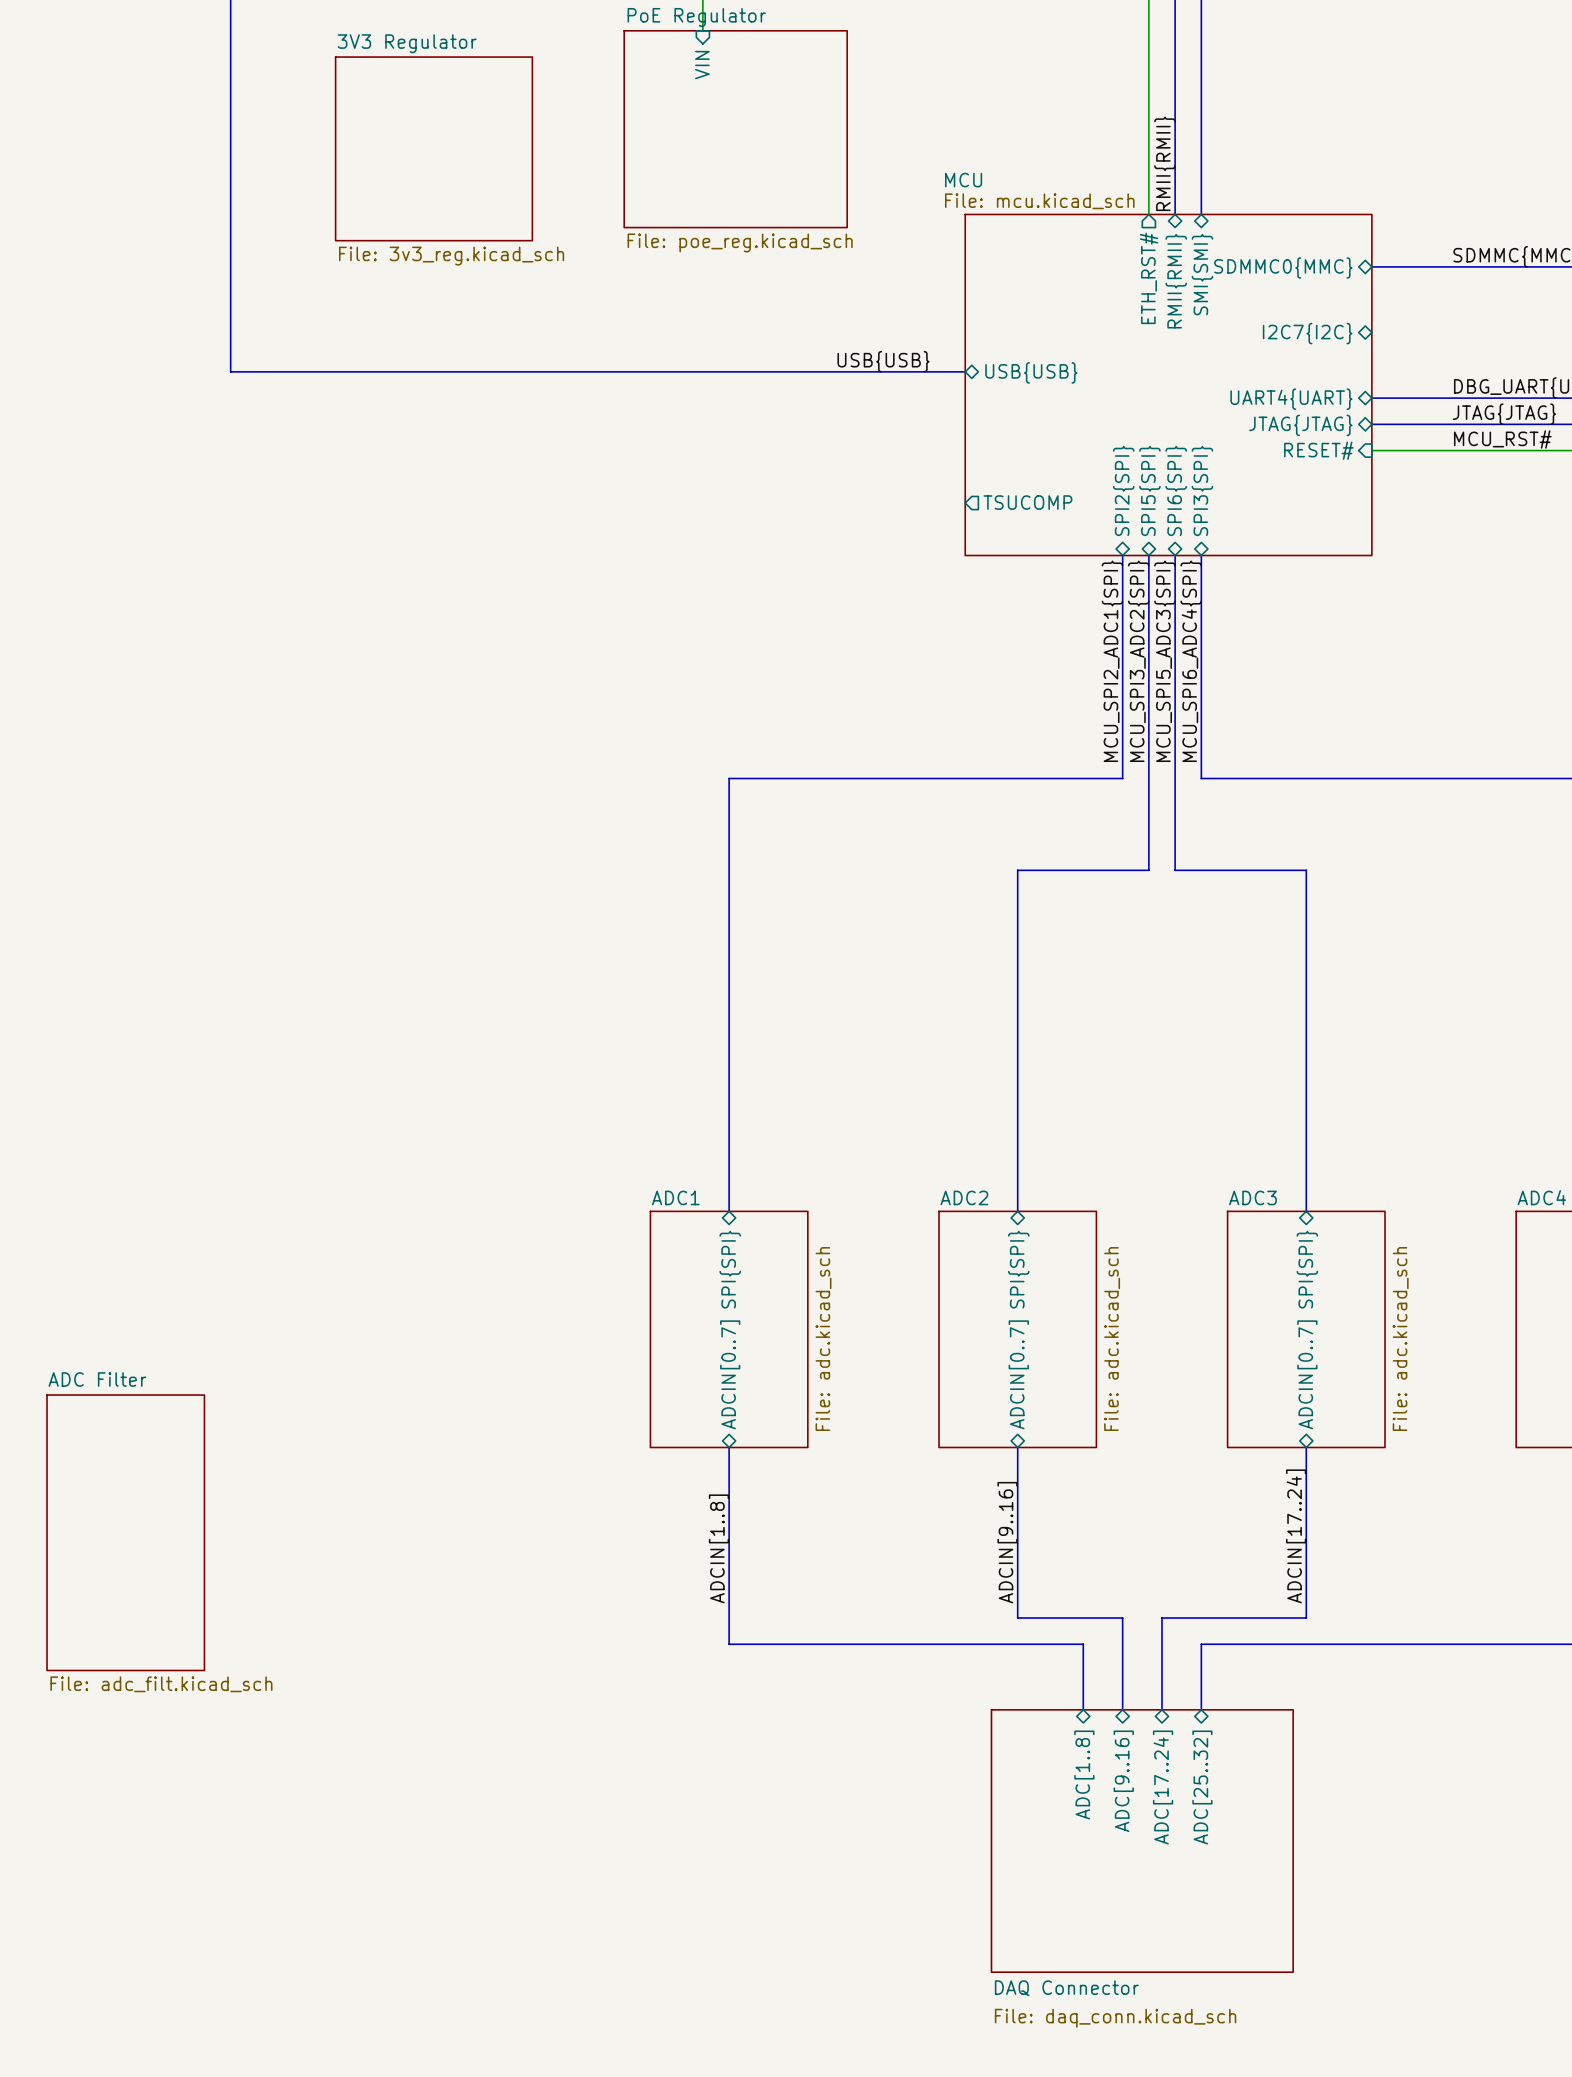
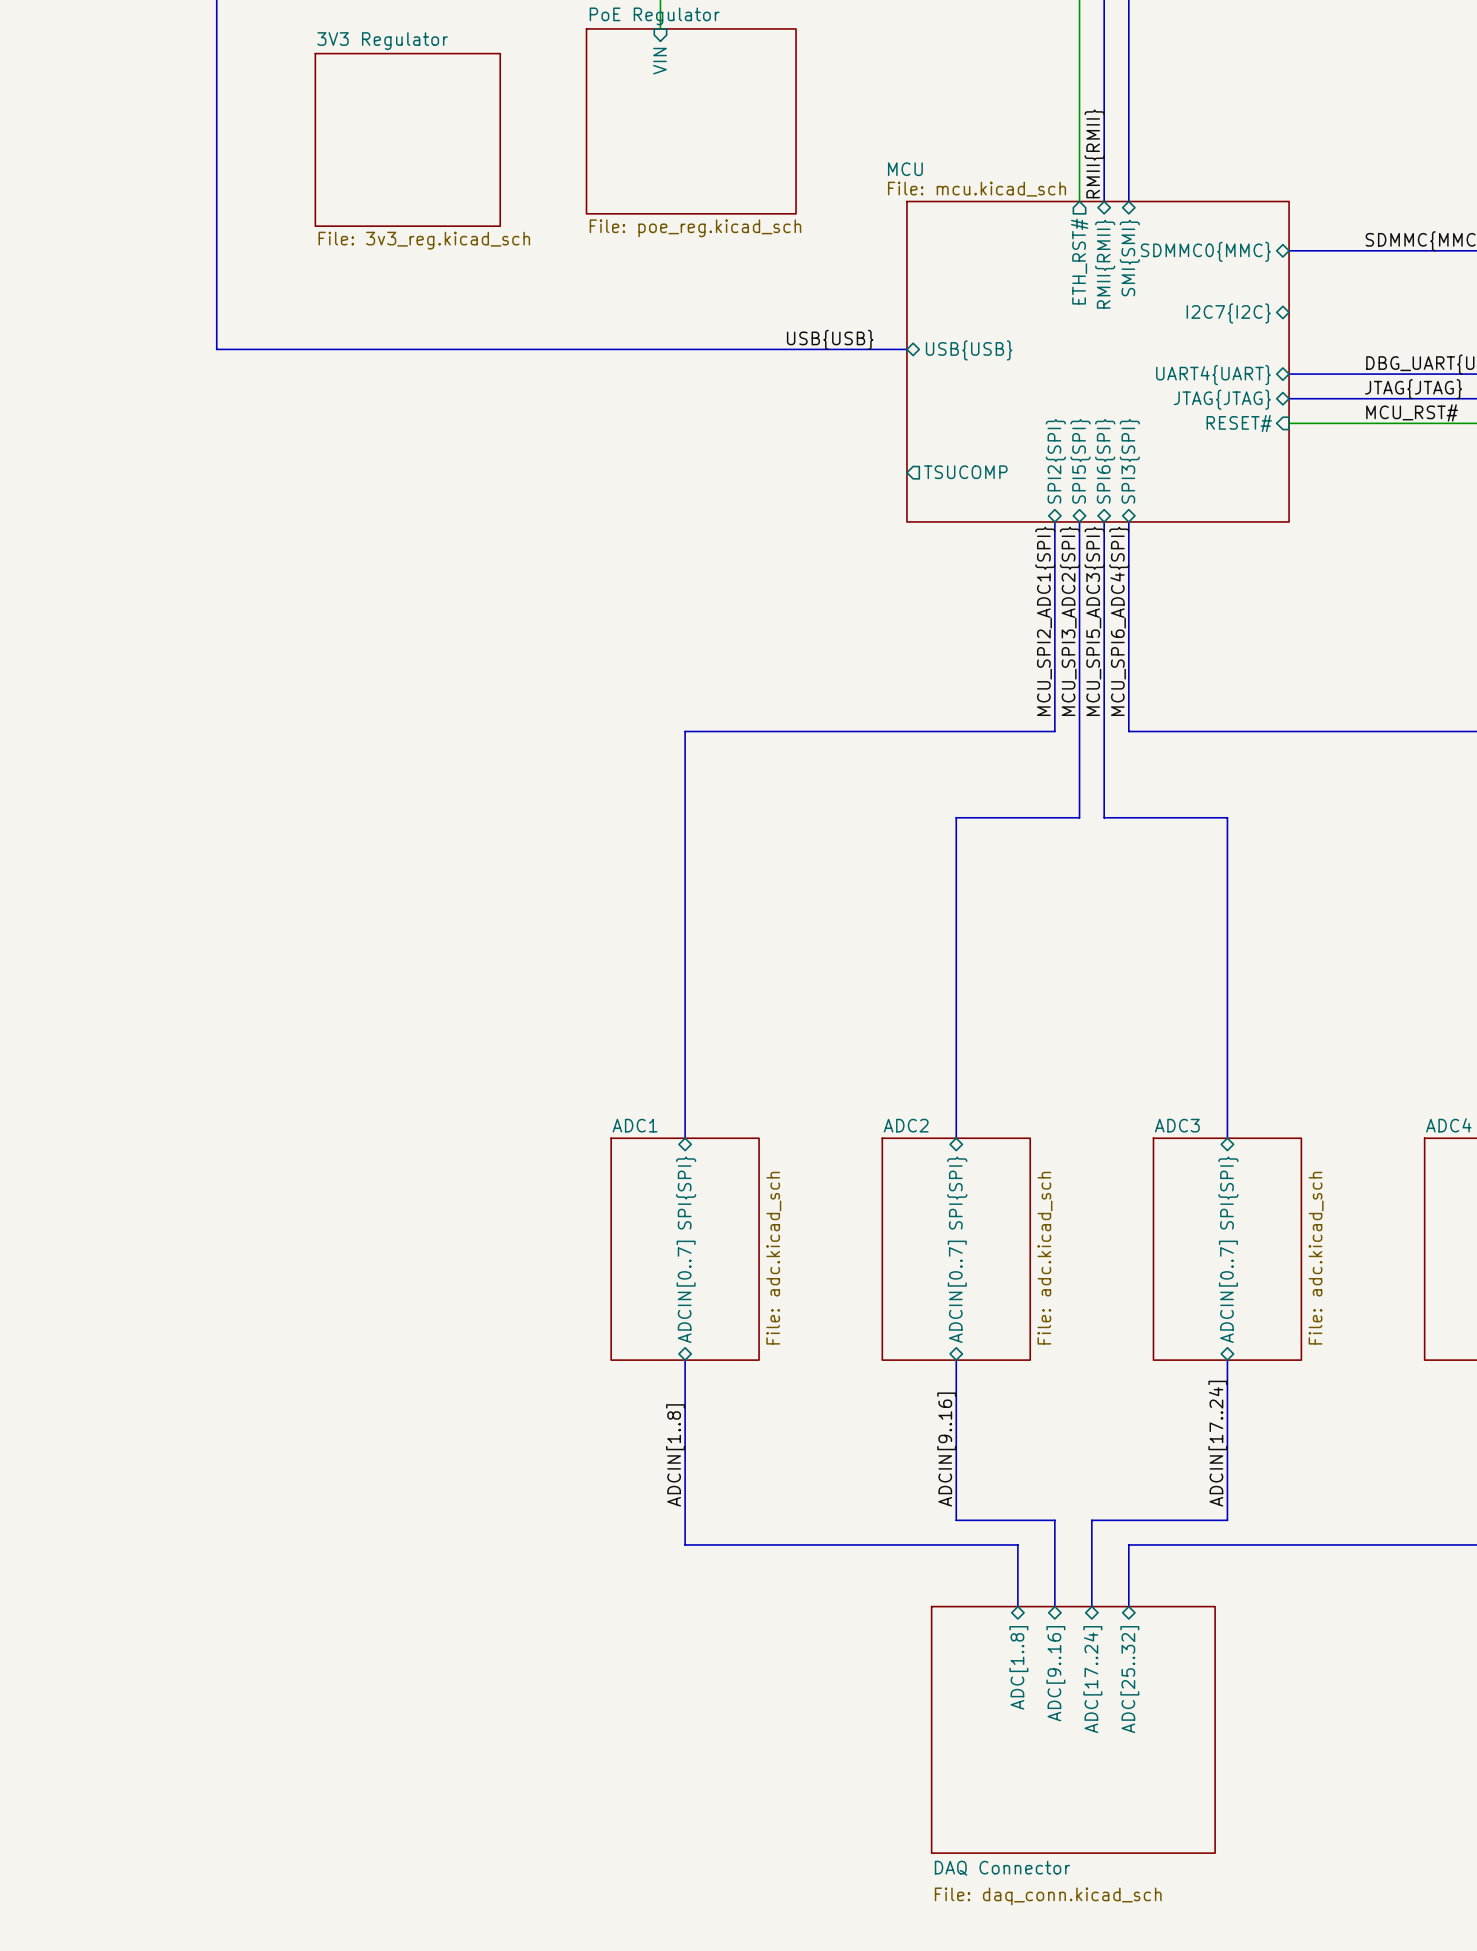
sheet ADC Filter: File: adc_filt.kicad_sch (125, 1532) -> none

